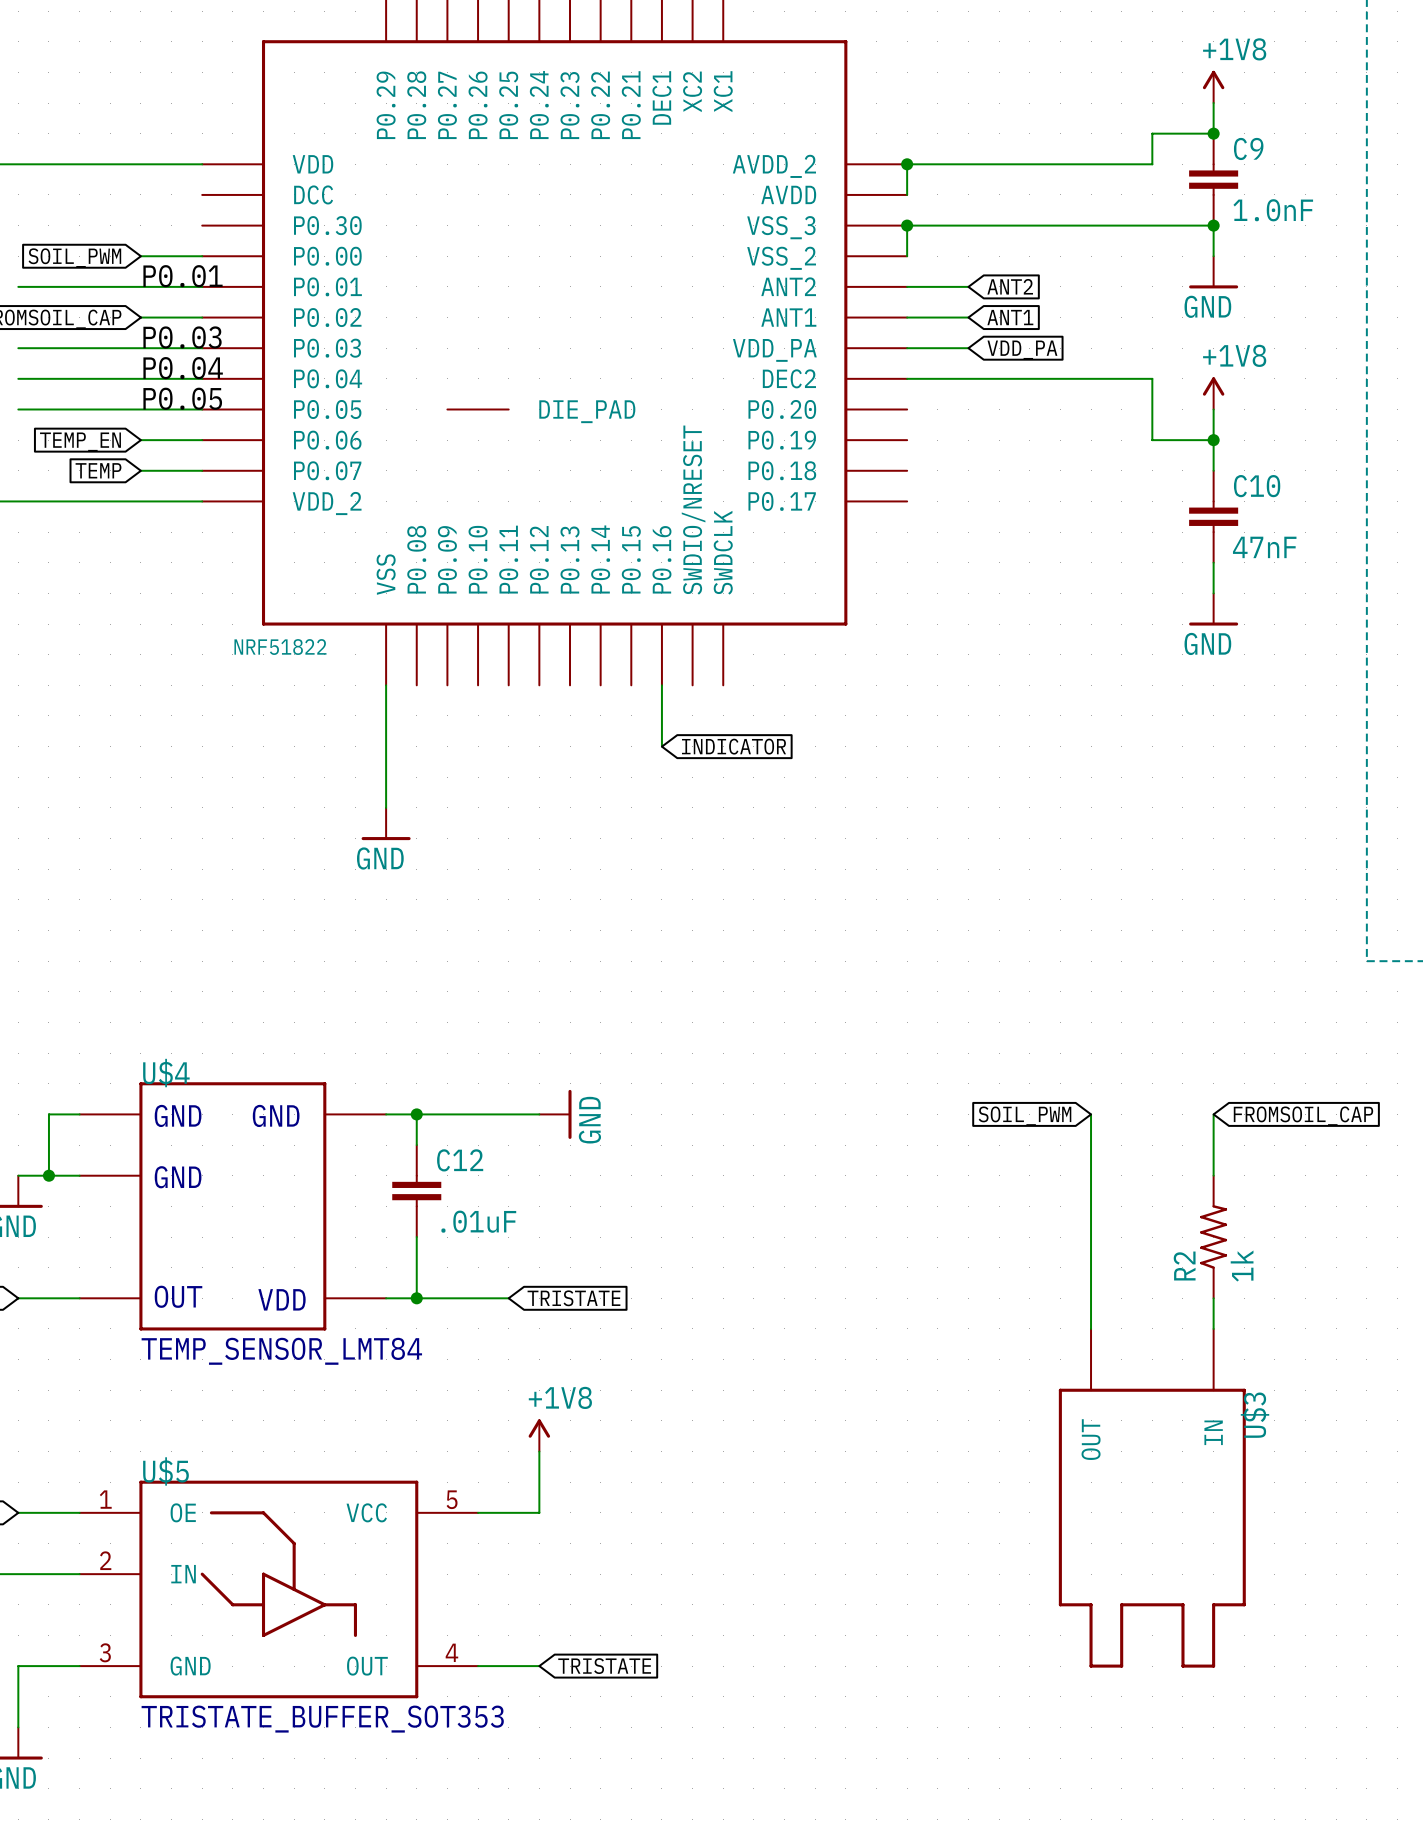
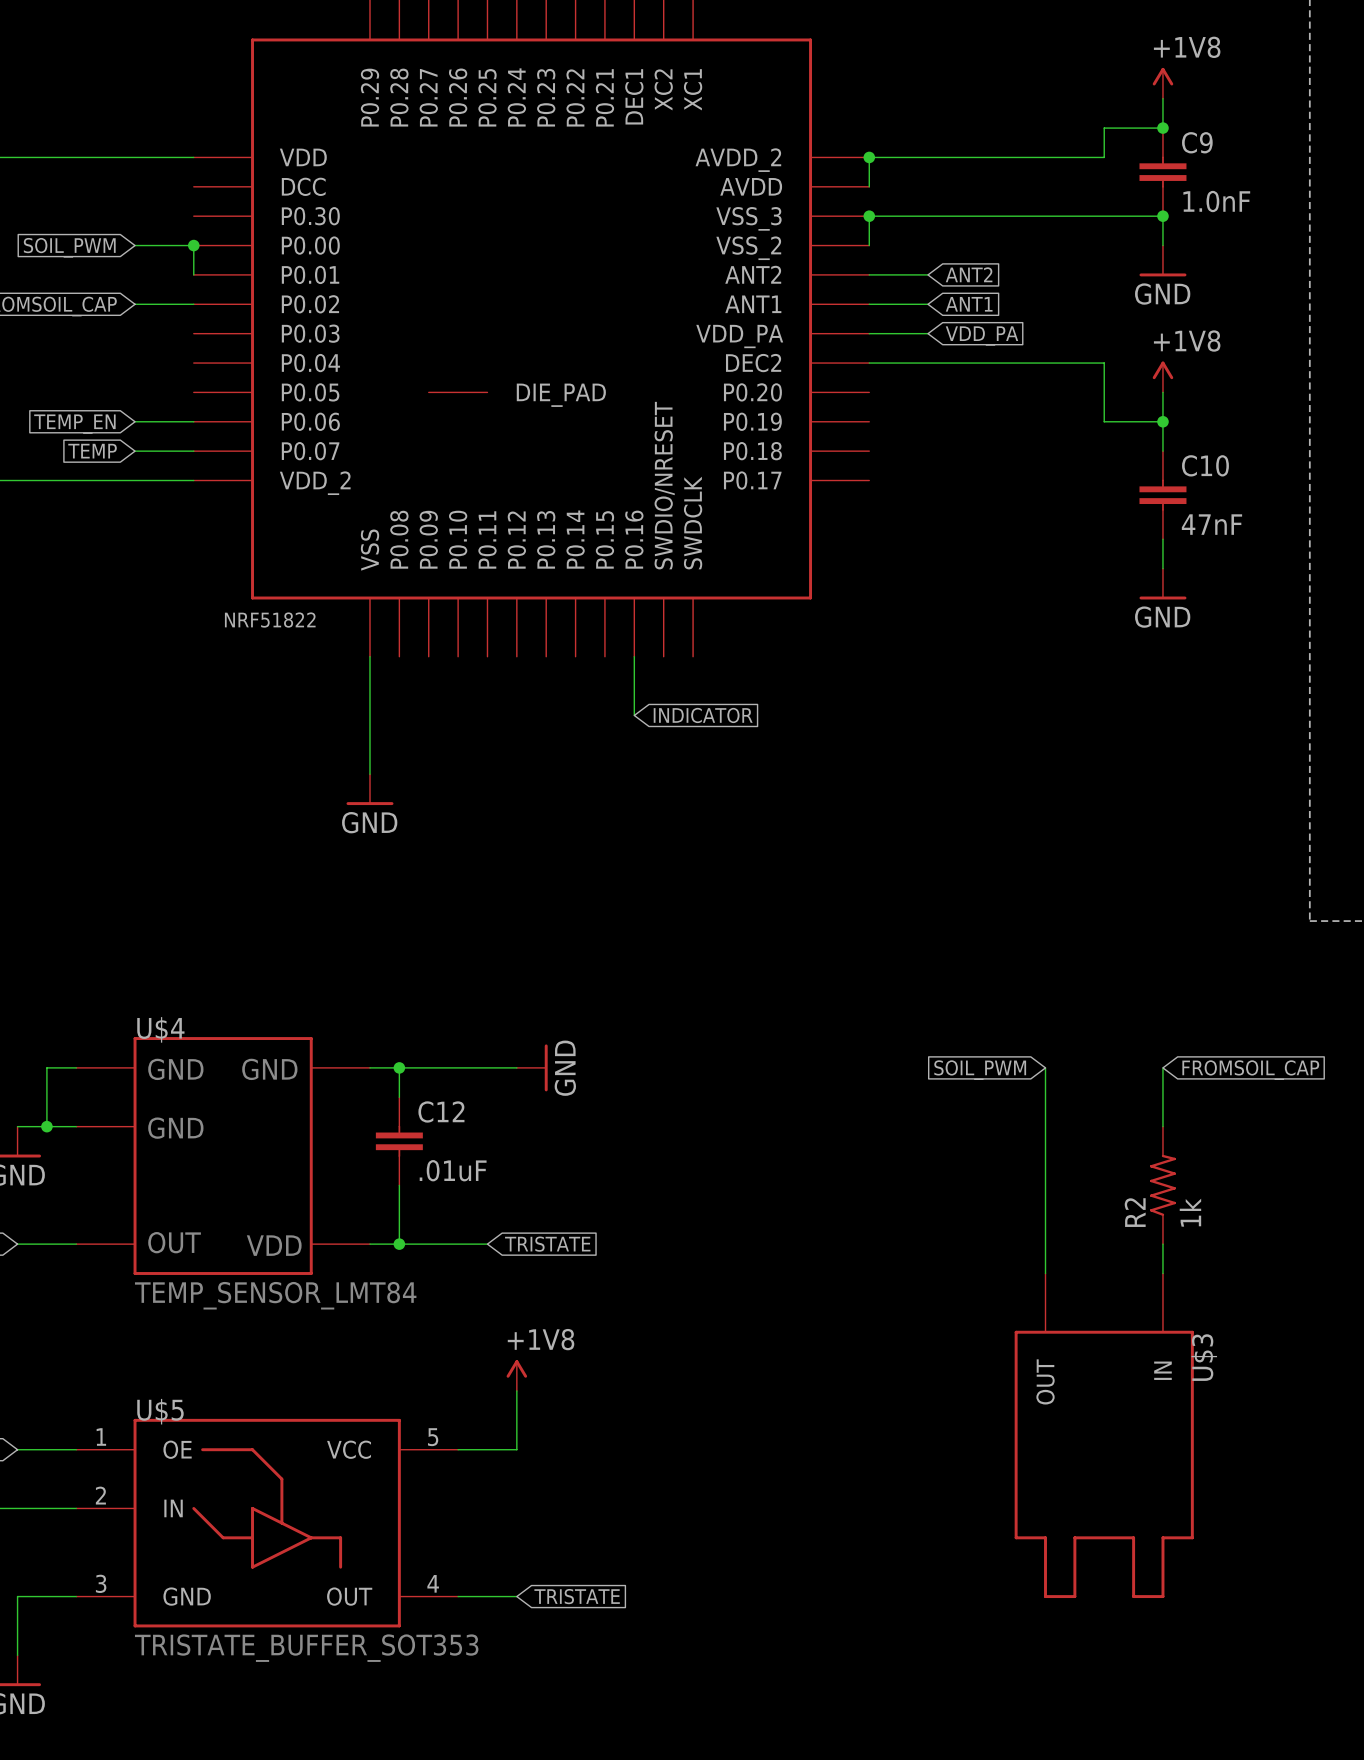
junction: none -> (193, 245)
label: P0.01 (183, 276) -> none
wire: (18, 286) (202, 286) -> (193, 245) (193, 274)
label: P0.03 (182, 337) -> none
wire: (18, 348) (202, 348) -> none
label: P0.04 (183, 368) -> none
wire: (18, 378) (202, 378) -> none
label: P0.05 (182, 398) -> none
wire: (18, 409) (202, 409) -> none

